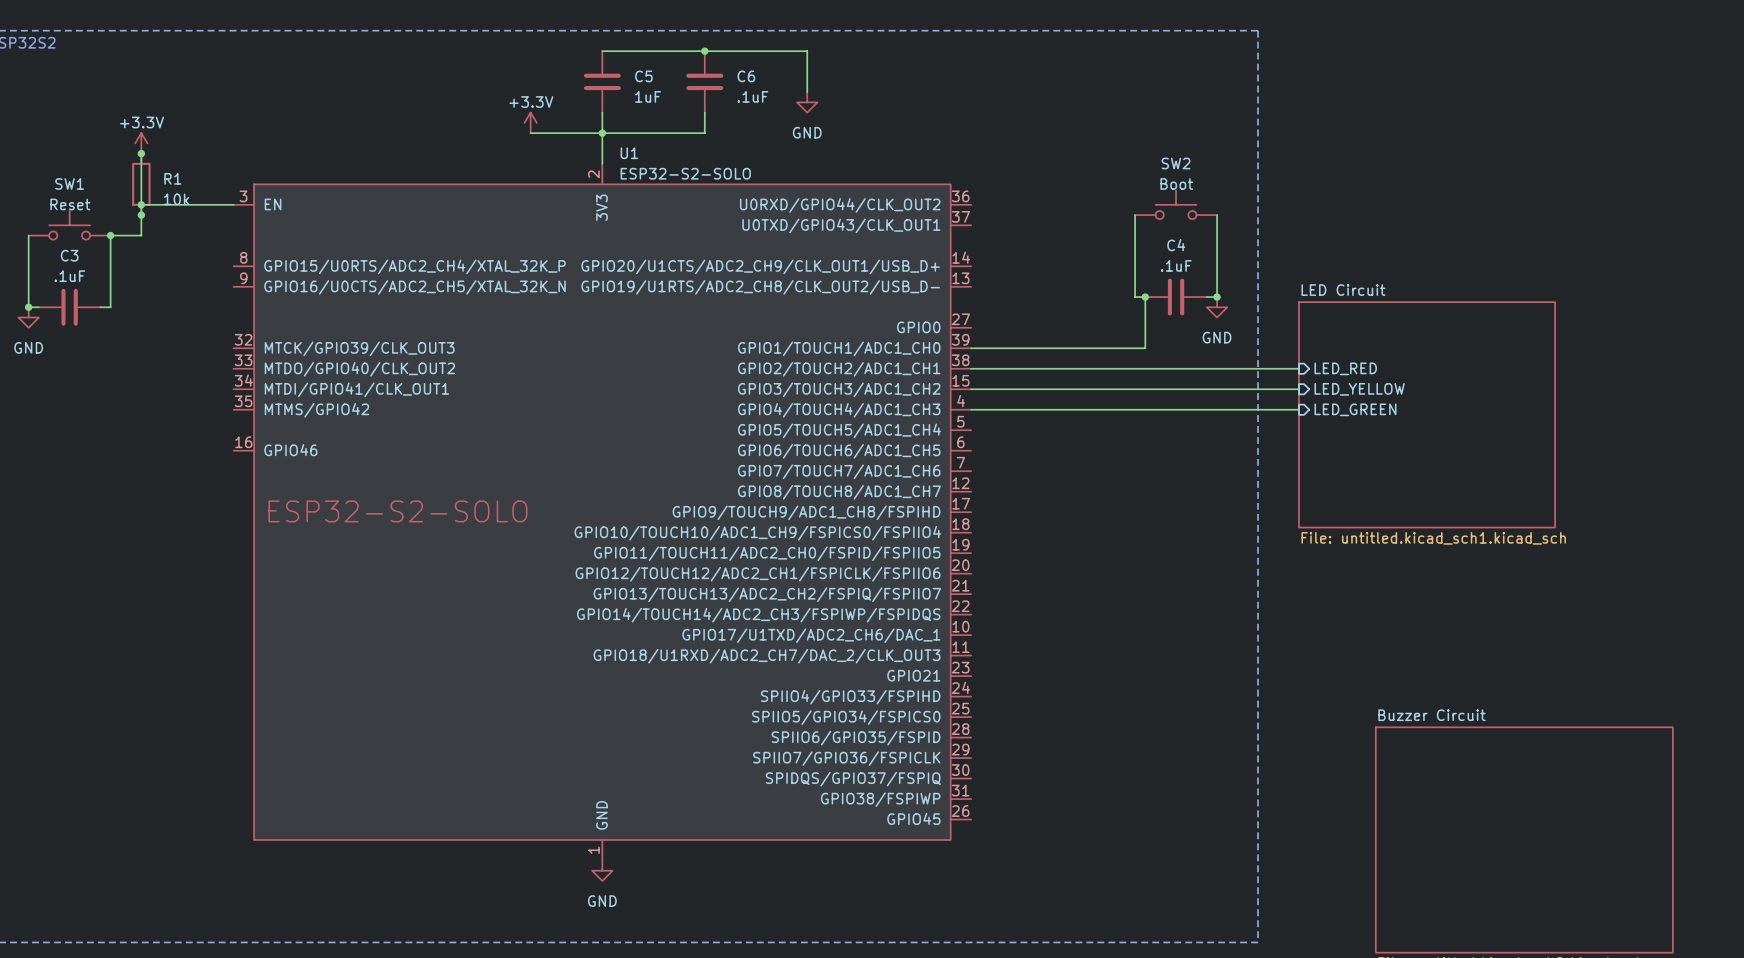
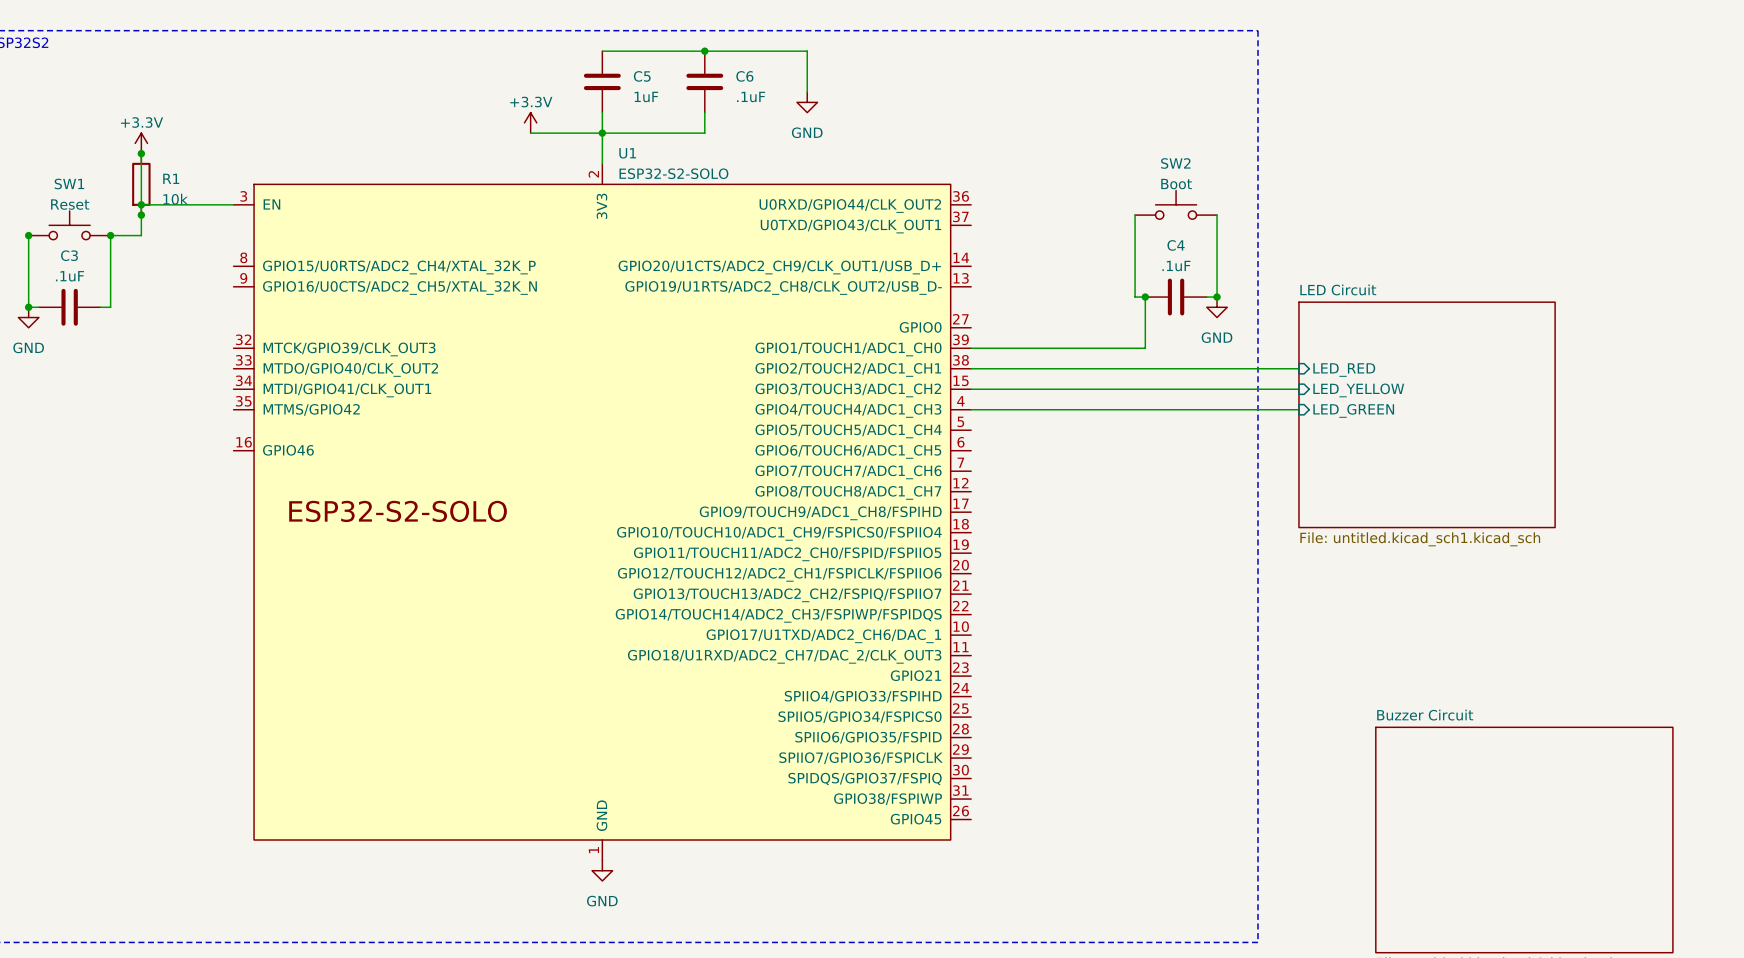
junction: none -> (28, 235)

